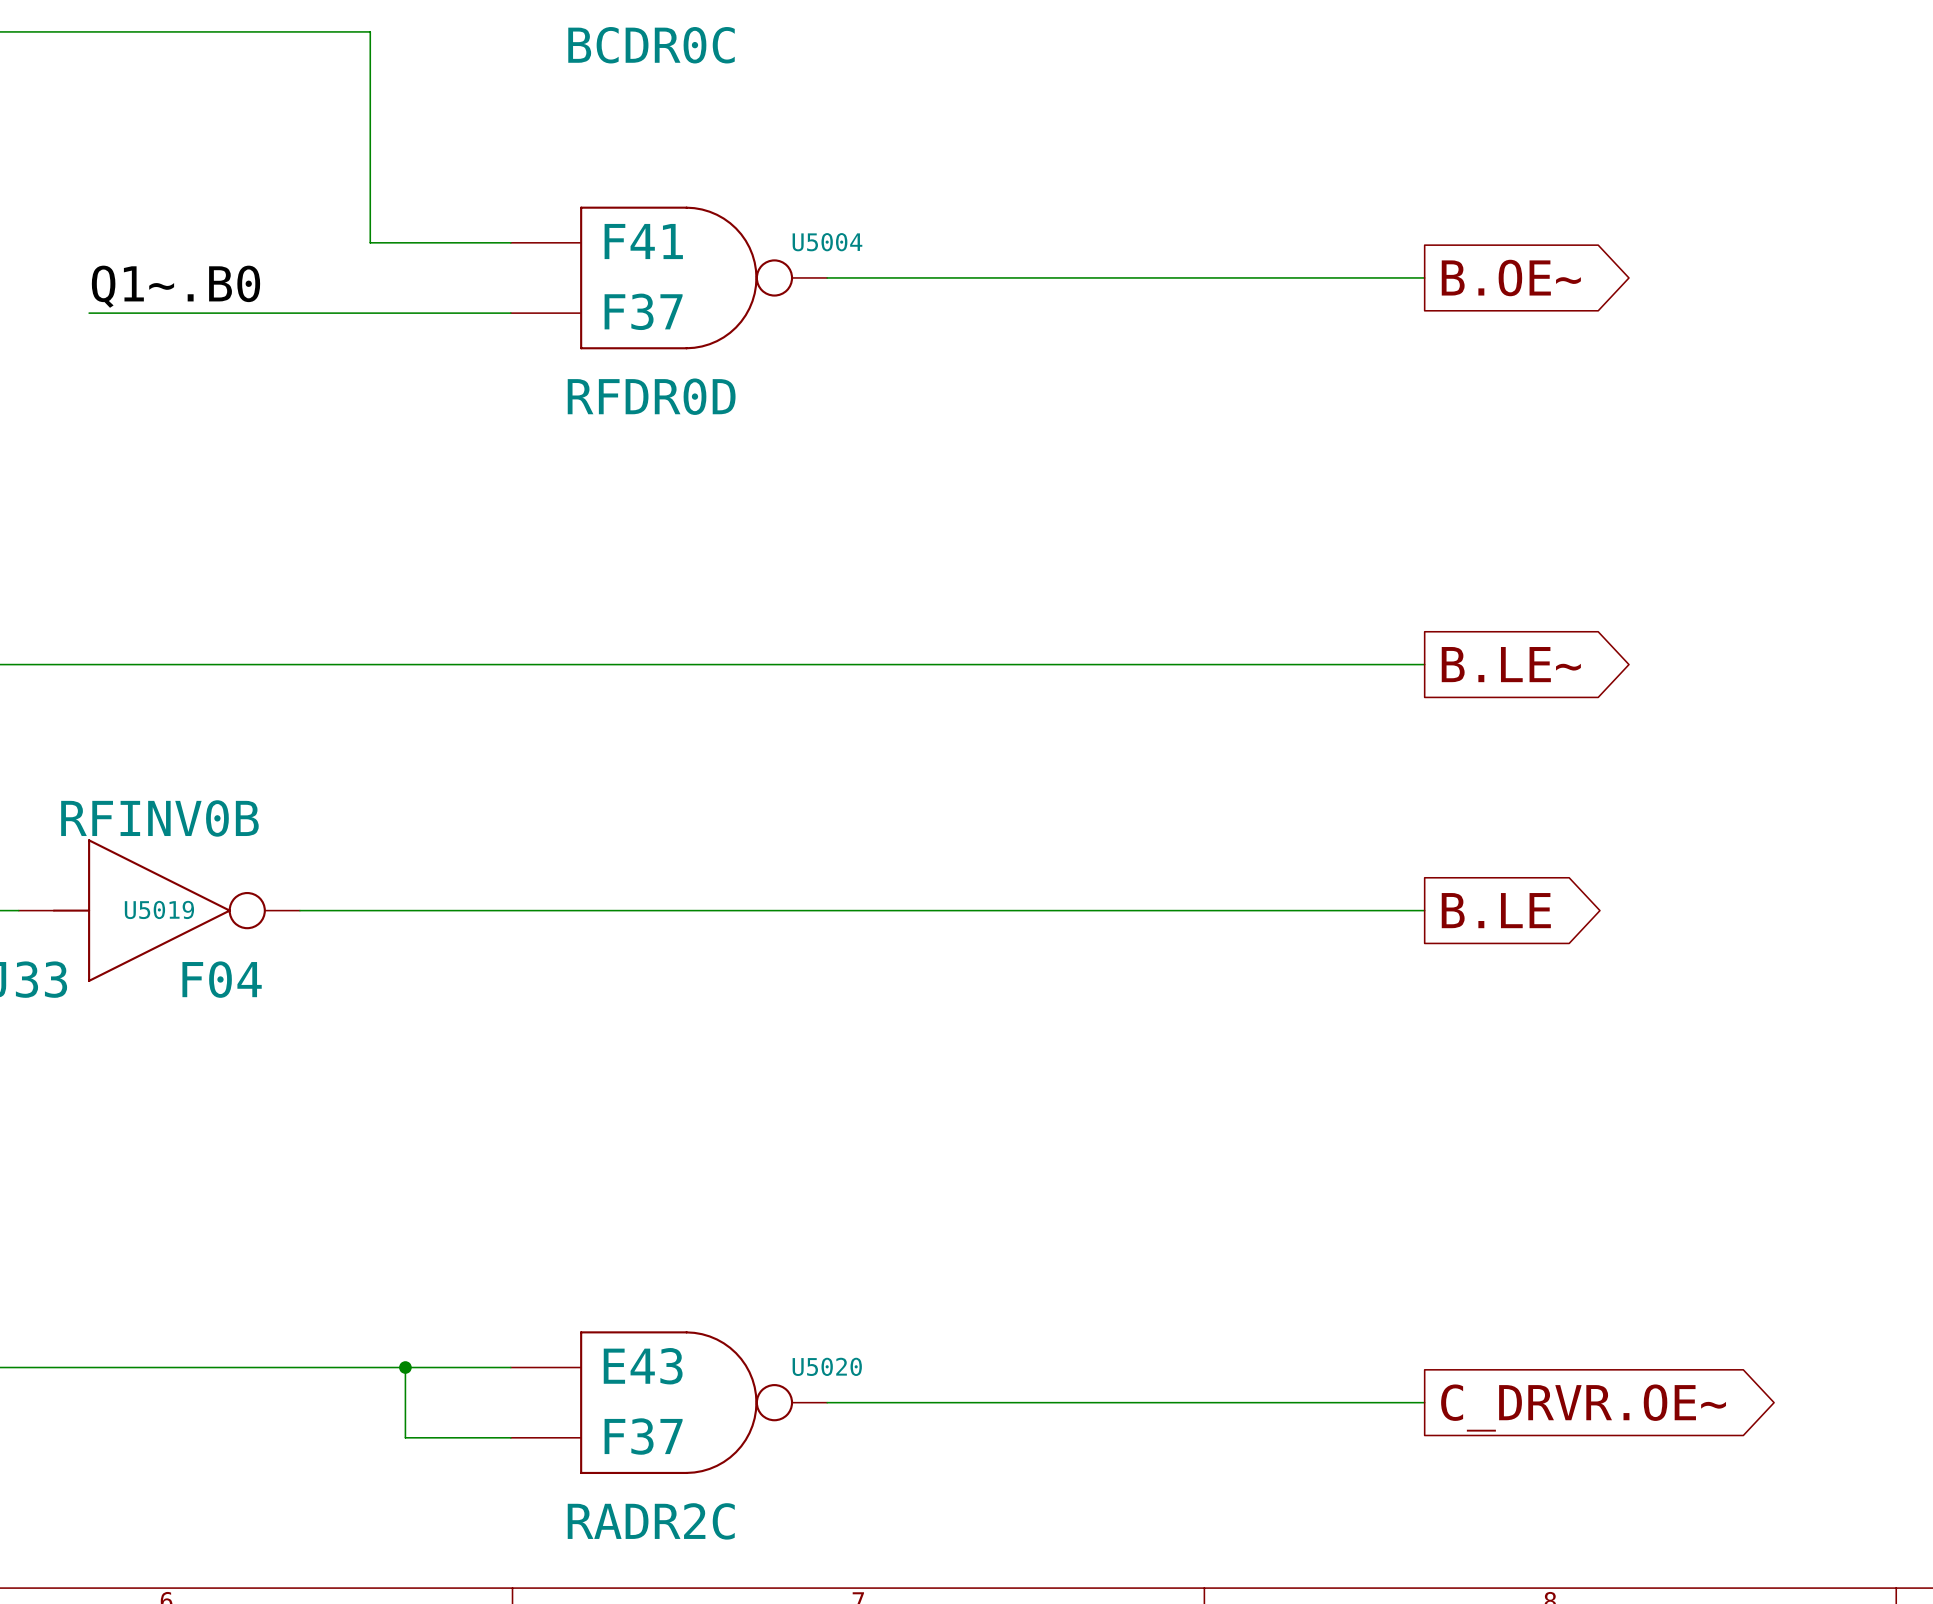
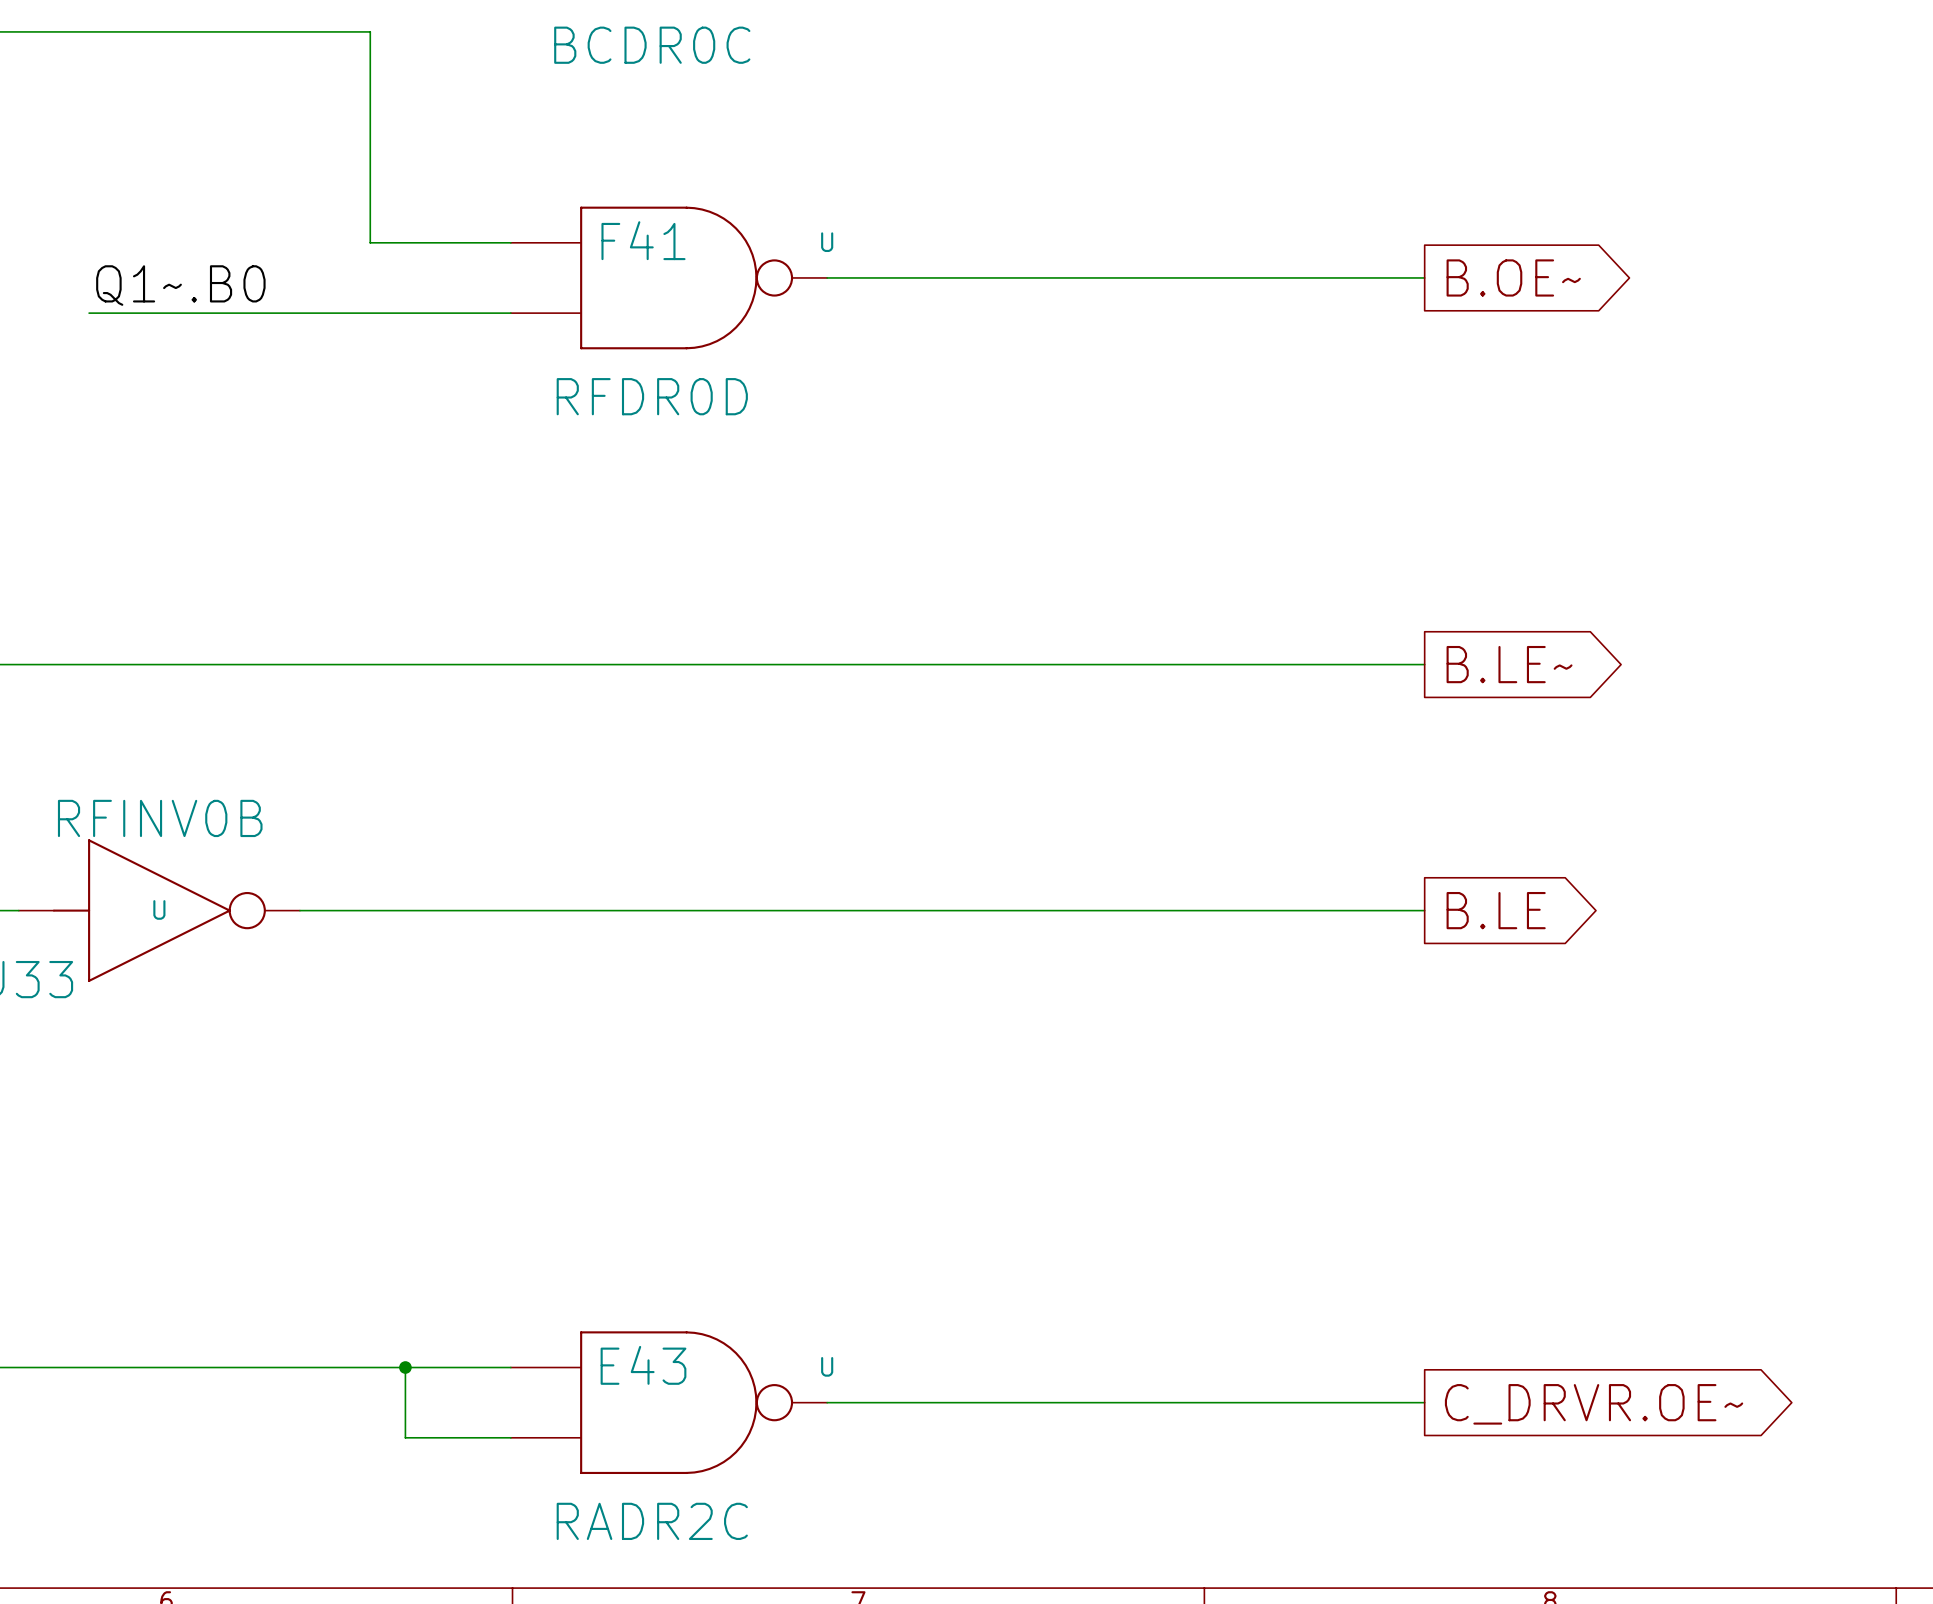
U5004 name: U5004 (827, 242) -> U (827, 242)
U5004 value: F37 (643, 311) -> none
U5019 name: U5019 (159, 909) -> U (159, 909)
U5019 value: F04 (222, 979) -> none
U5020 name: U5020 (827, 1366) -> U (827, 1366)
U5020 value: F37 (643, 1436) -> none

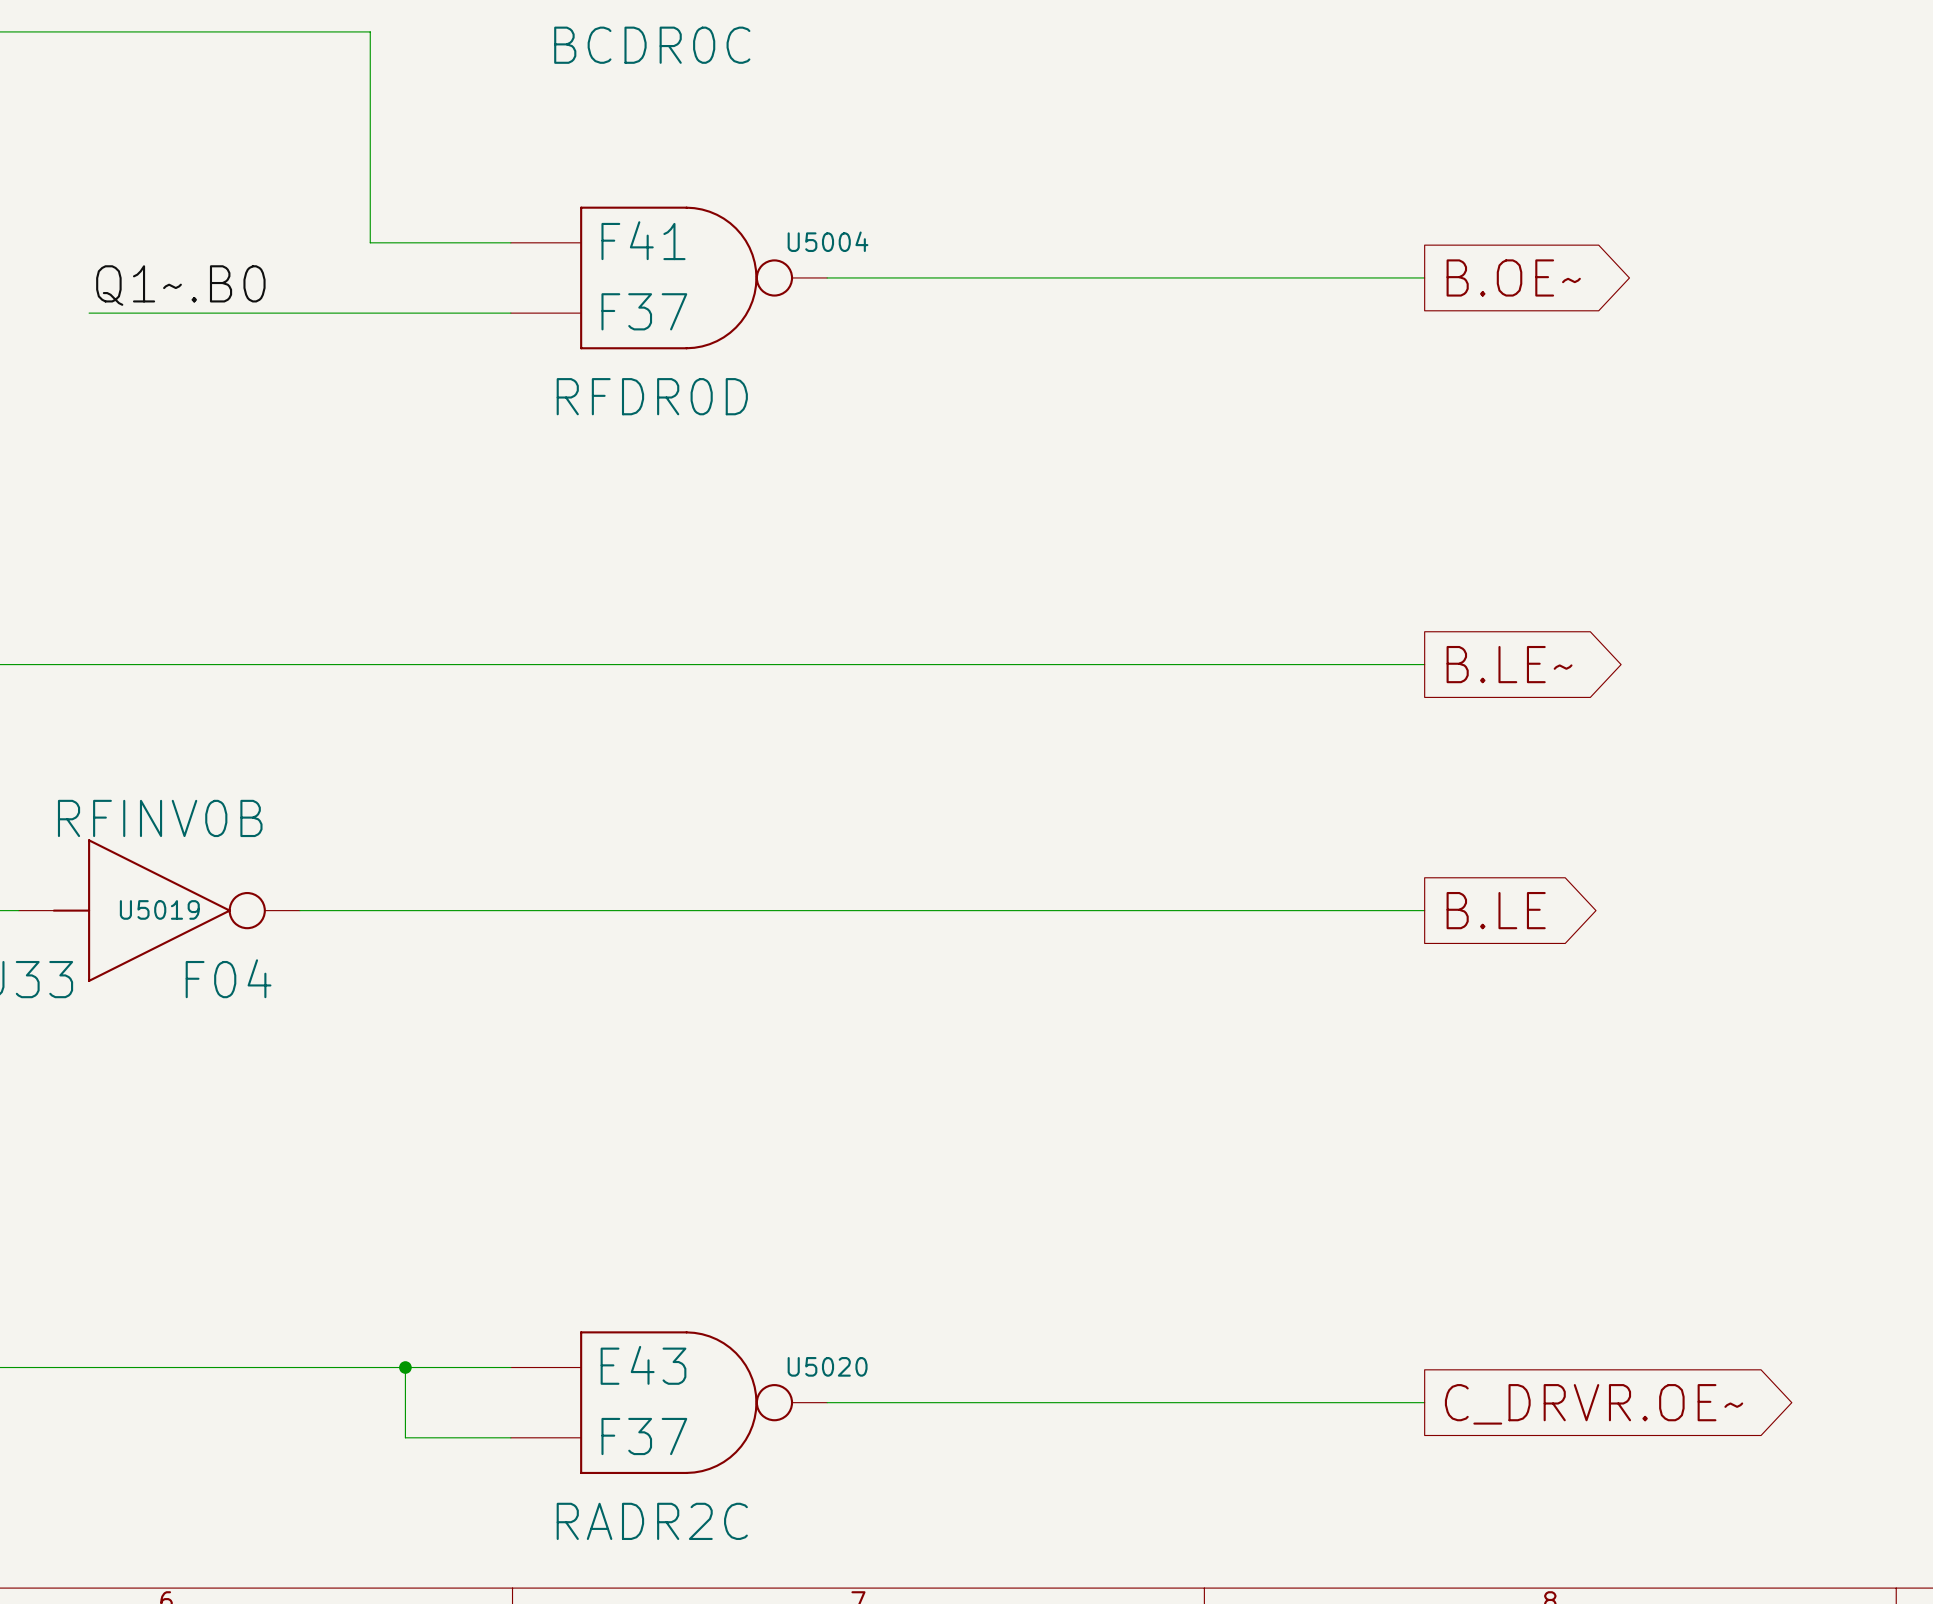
U name: U (827, 242) -> U5004 (828, 241)
U value: none -> F37 (644, 311)
U name: U (159, 909) -> U5019 (159, 909)
U value: none -> F04 (228, 978)
U name: U (827, 1366) -> U5020 (827, 1366)
U value: none -> F37 (644, 1436)

